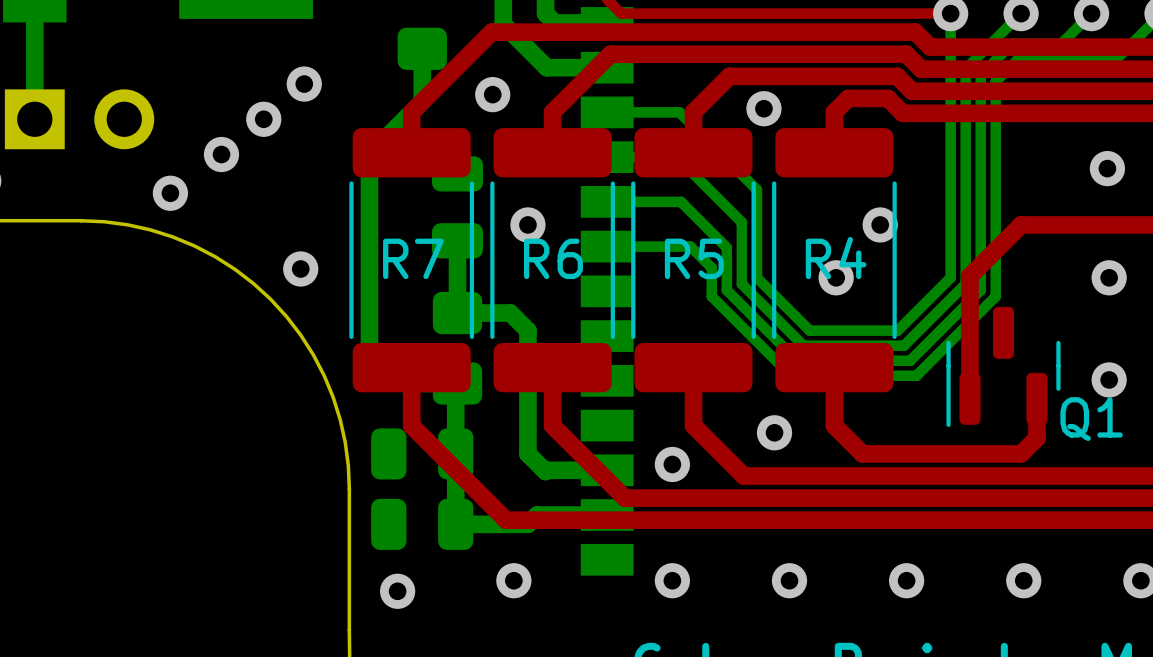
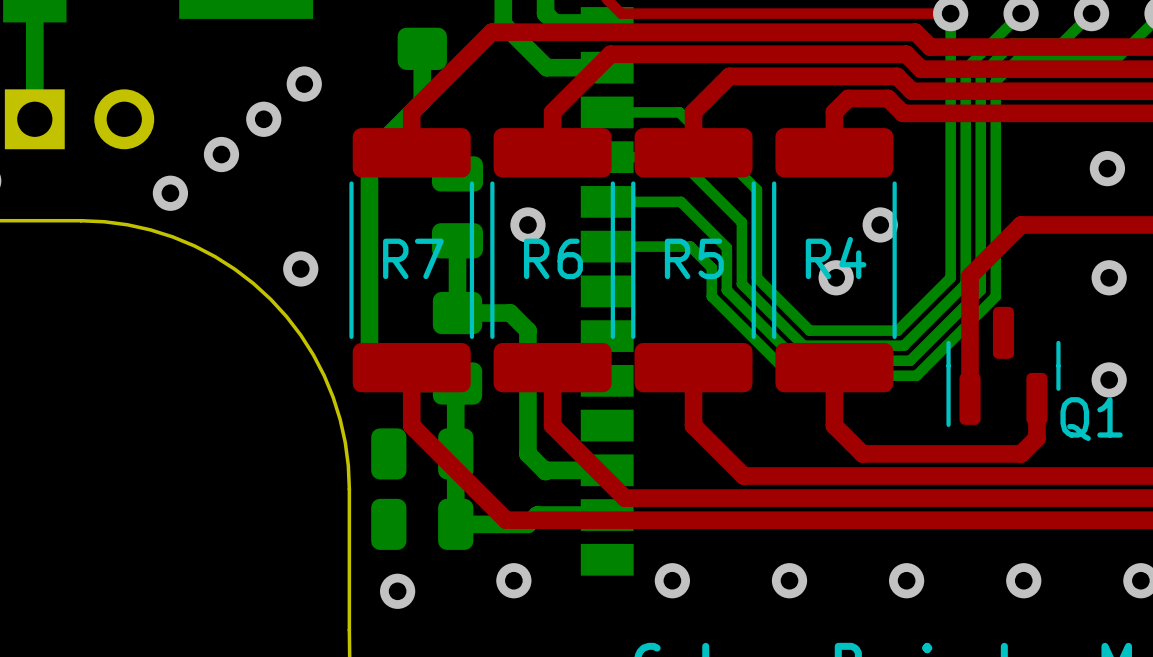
via: (492, 94) -> none
via: (763, 108) -> none
via: (774, 432) -> none
via: (672, 464) -> none

